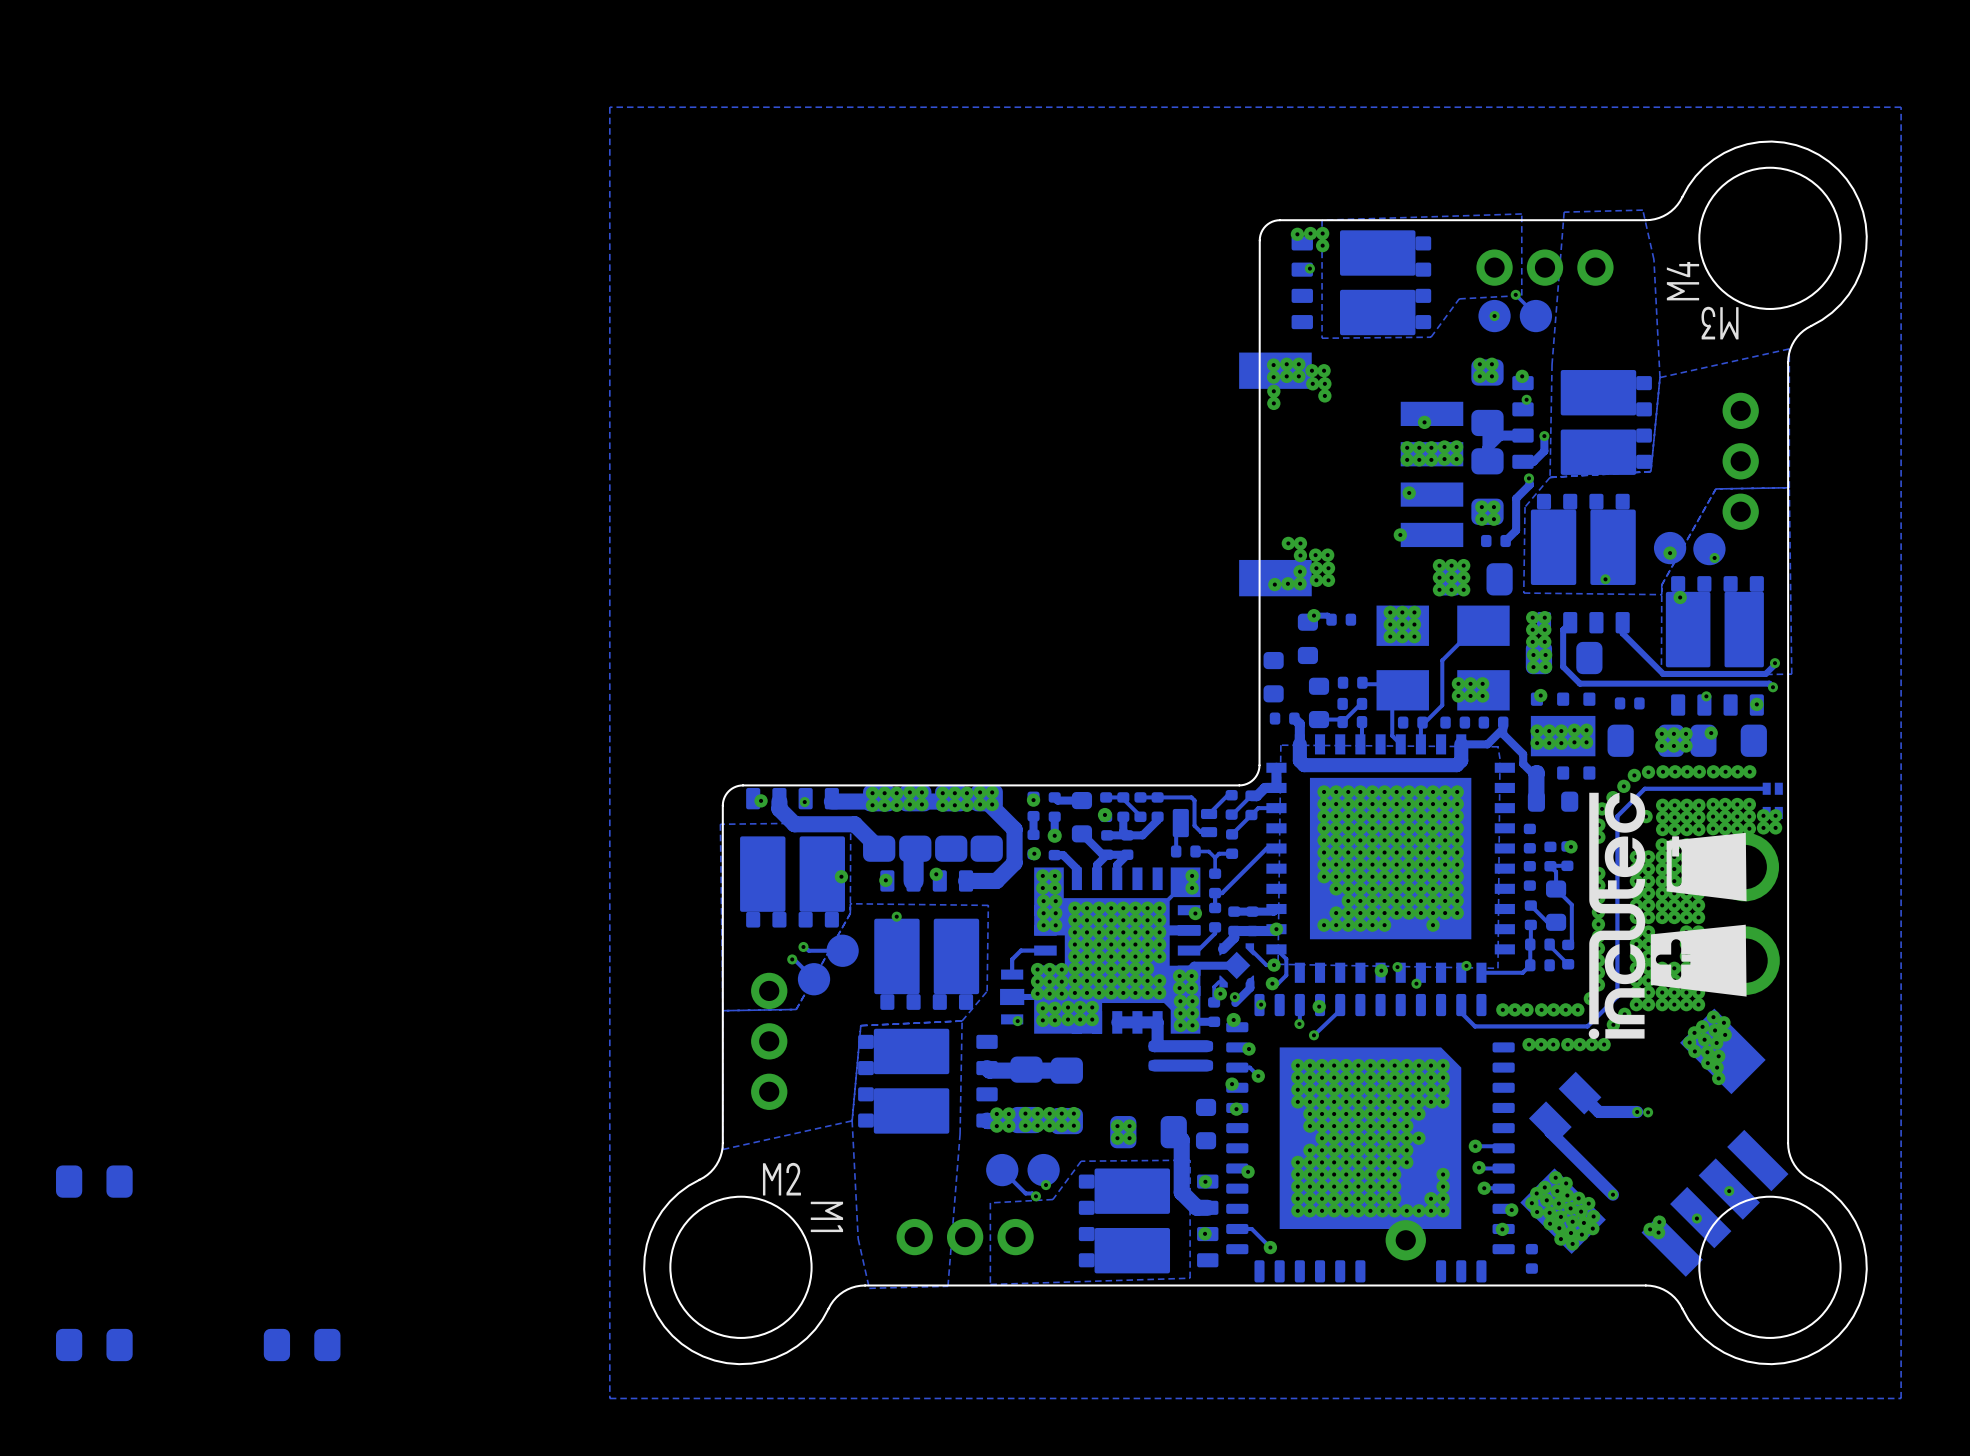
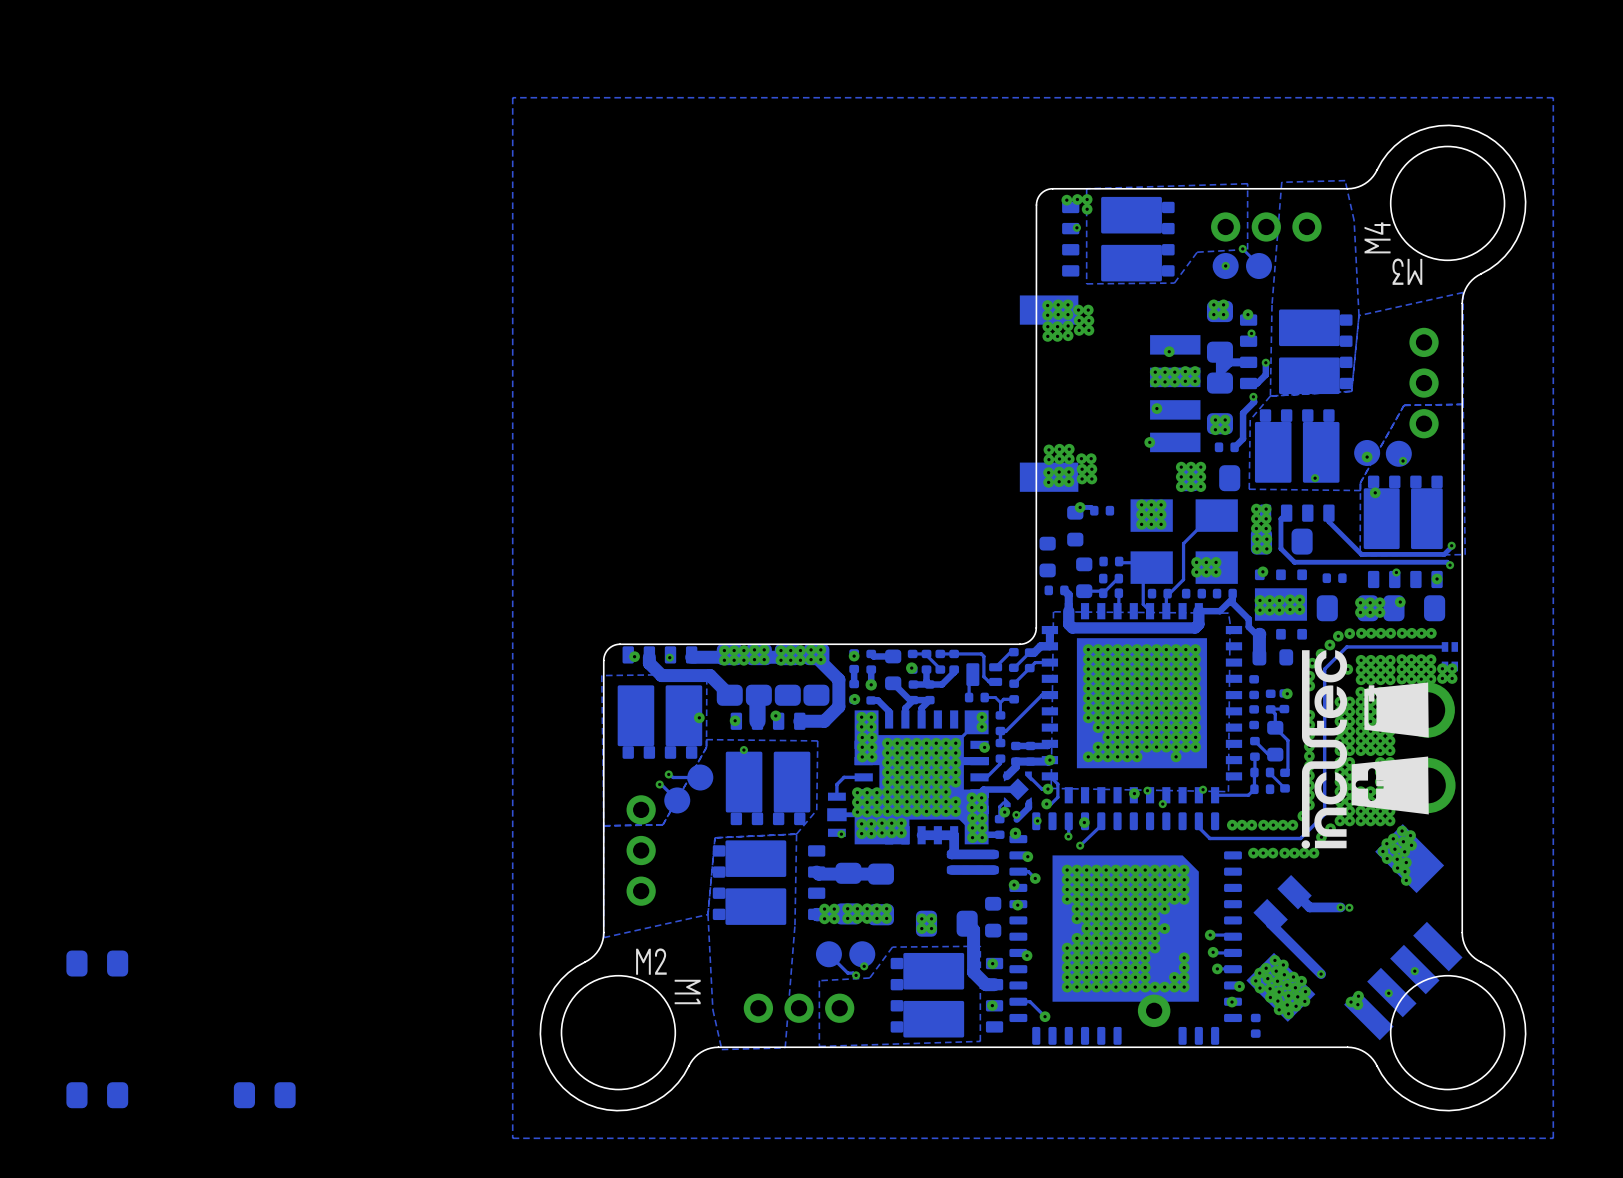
via: none -> (1068, 326)
via: none -> (1057, 326)
via: none -> (1079, 330)
via: none -> (1068, 335)
via: none -> (1057, 336)
via: none -> (1048, 449)
via: none -> (1059, 459)
via: none -> (1048, 459)
via: none -> (1059, 472)
via: none -> (1048, 472)

